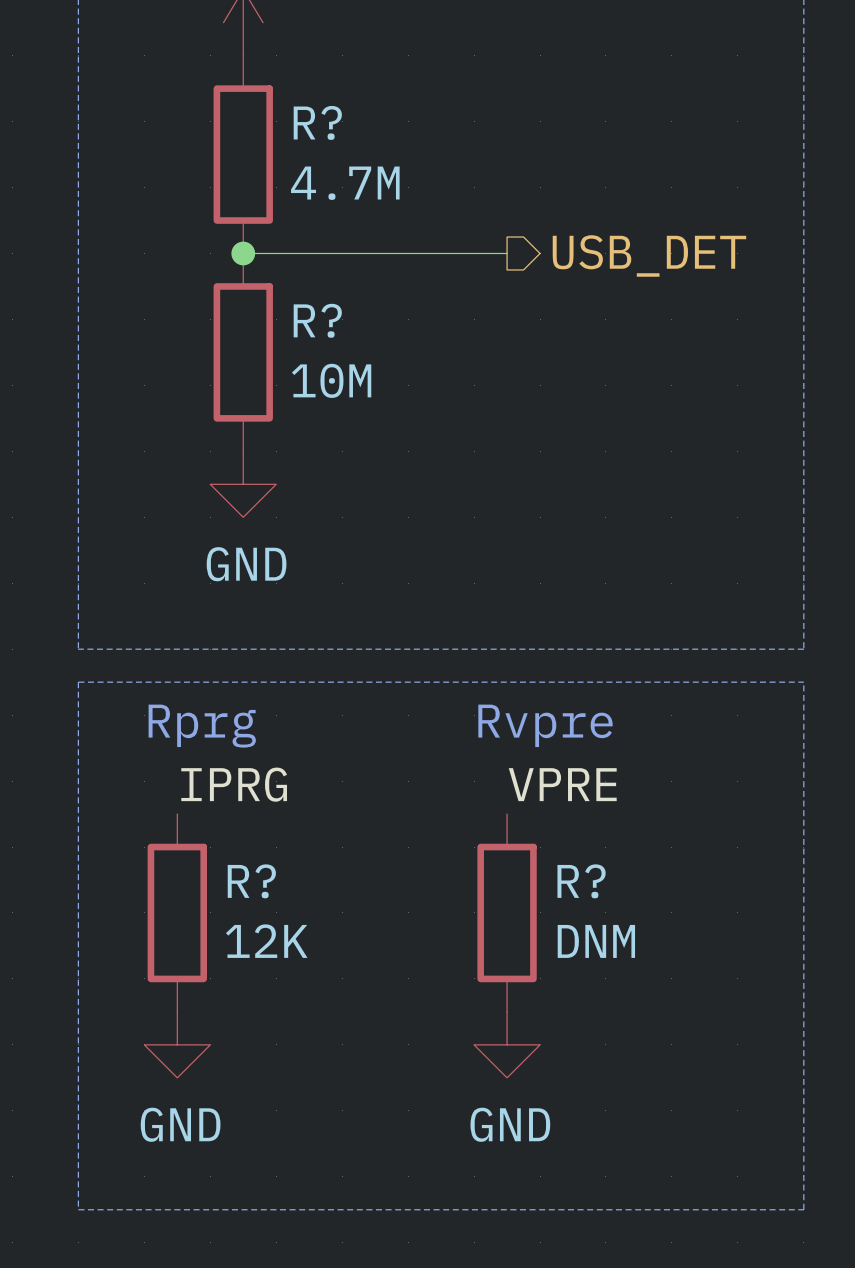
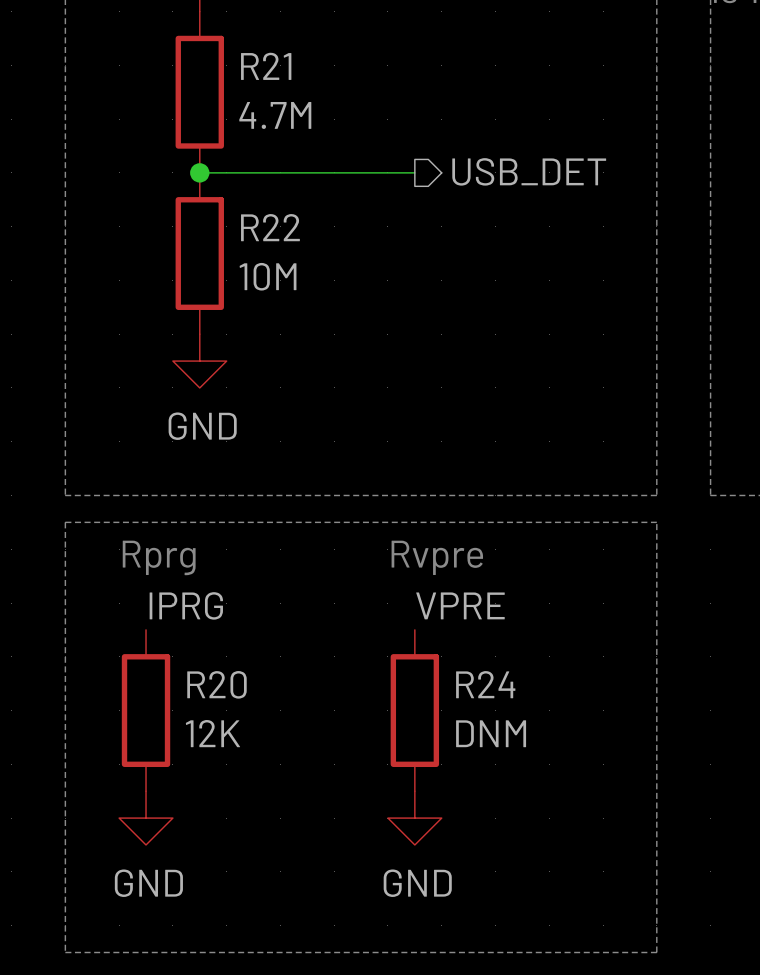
R? name: R? (317, 122) -> R21 (266, 66)
R? name: R? (317, 320) -> R22 (270, 227)
R? name: R? (251, 881) -> R20 (216, 684)
R? name: R? (581, 881) -> R24 (485, 684)

